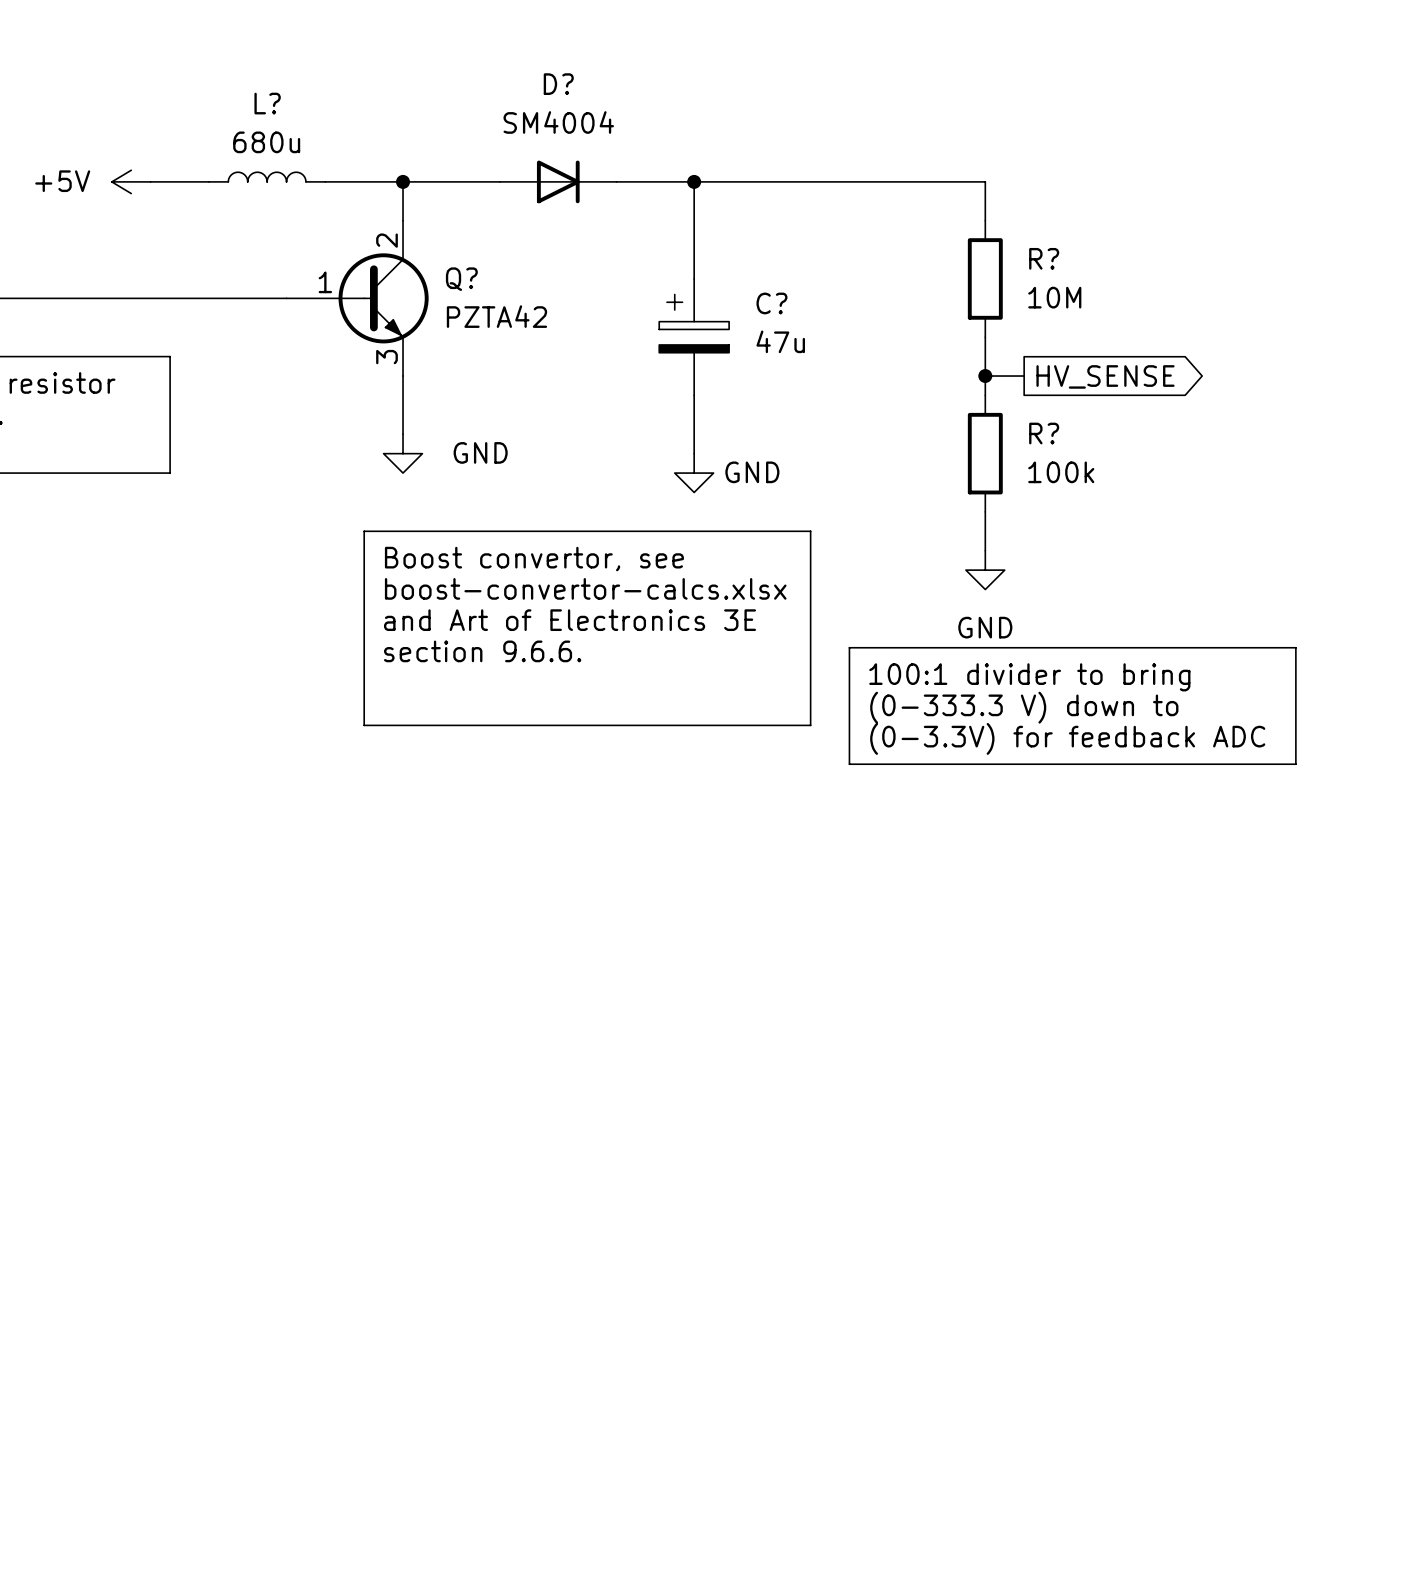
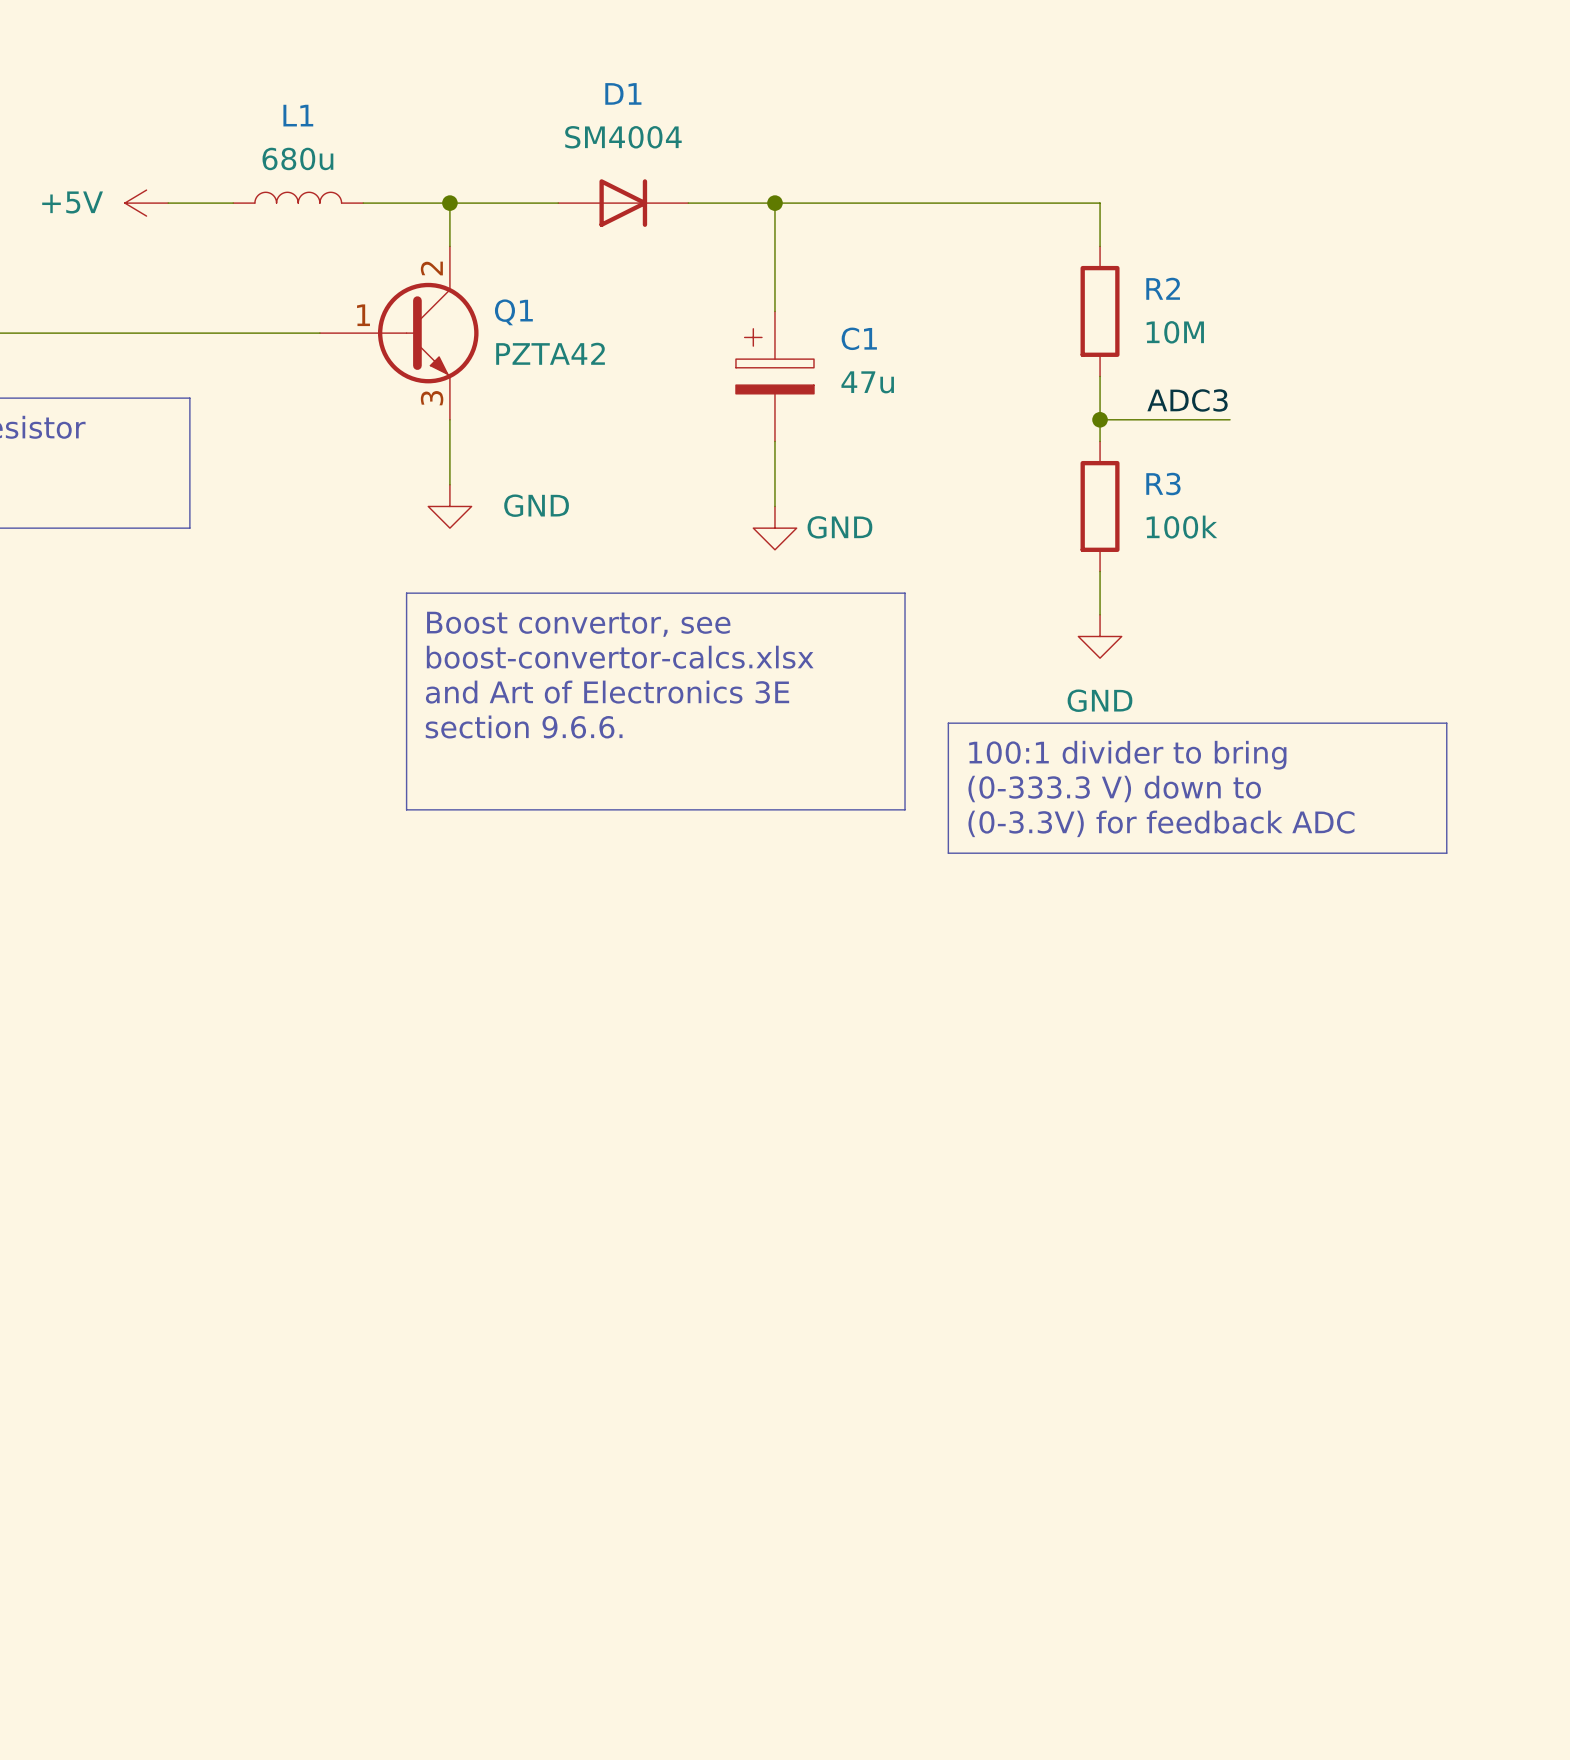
D? name: D? (558, 84) -> D1 (623, 93)
L? name: L? (267, 103) -> L1 (298, 115)
R? name: R? (1044, 258) -> R2 (1163, 288)
Q? name: Q? (461, 279) -> Q1 (513, 312)
C? name: C? (771, 303) -> C1 (859, 338)
label: none -> ADC3 (1187, 400)
wire: none -> (1143, 419) (1230, 419)
global label: HV_SENSE (1105, 376) -> none
R? name: R? (1044, 433) -> R3 (1163, 484)

